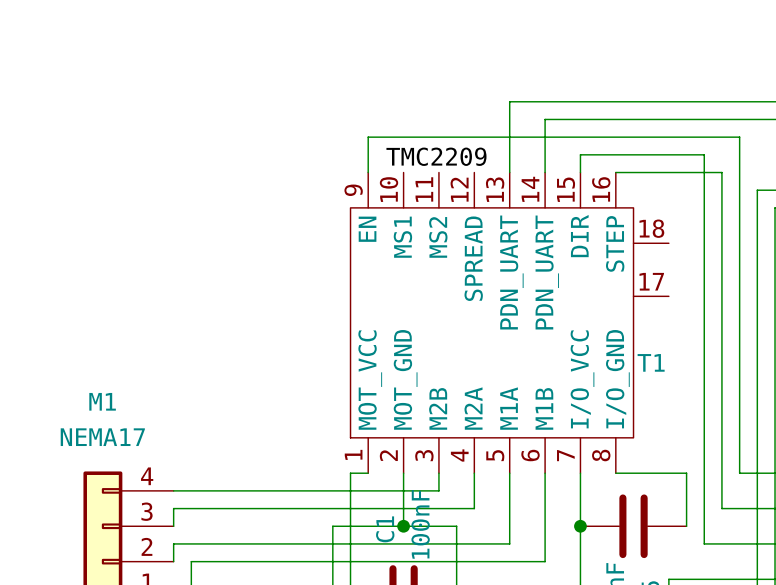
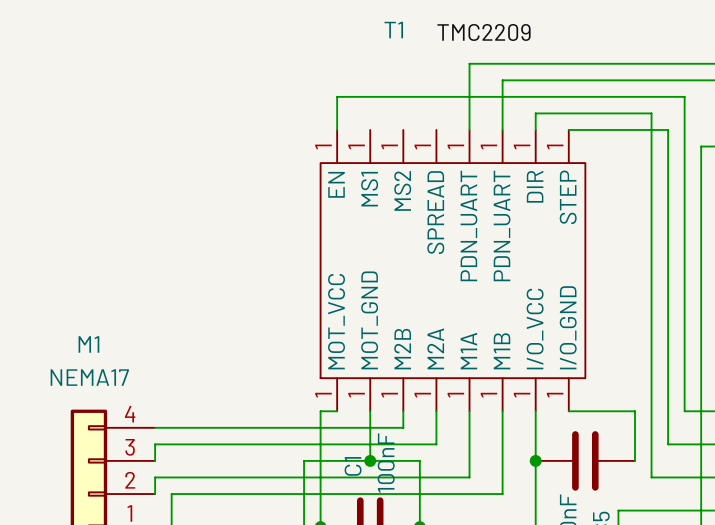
label position: TMC2209 (436, 156) -> TMC2209 (484, 32)
T1 symbol: [350, 172, 669, 474] -> [320, 129, 586, 412]
T1 name position: T1 (651, 362) -> T1 (393, 30)

